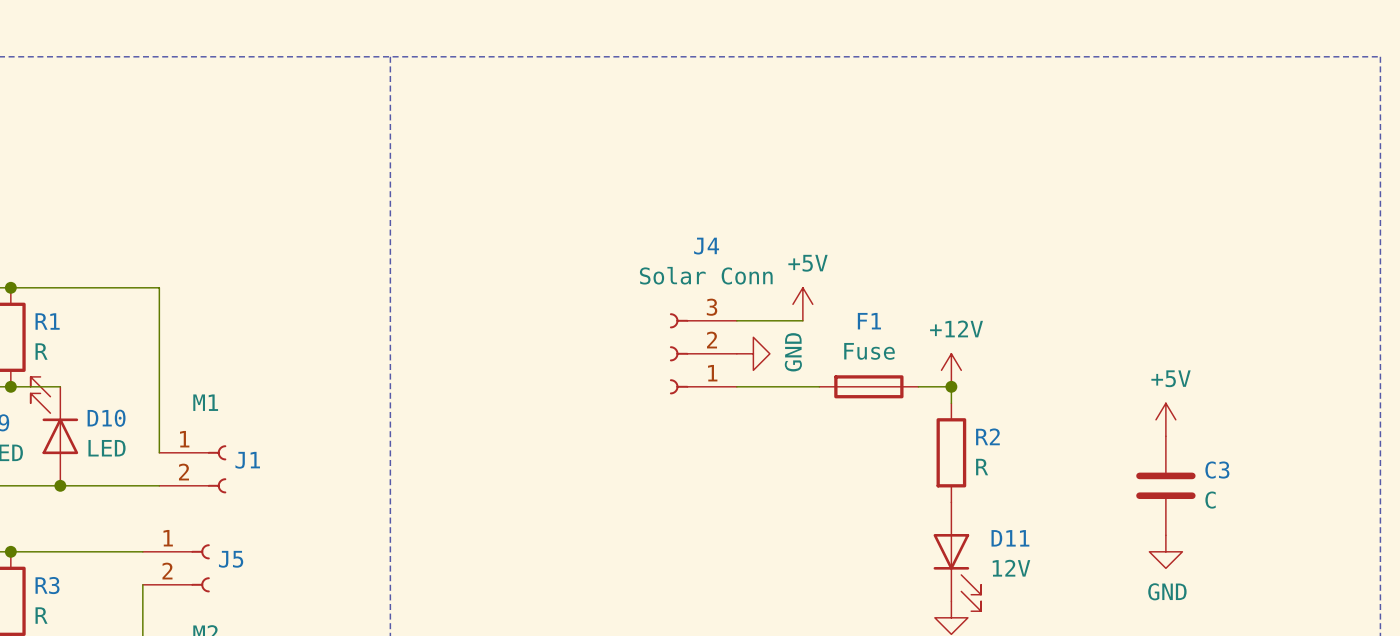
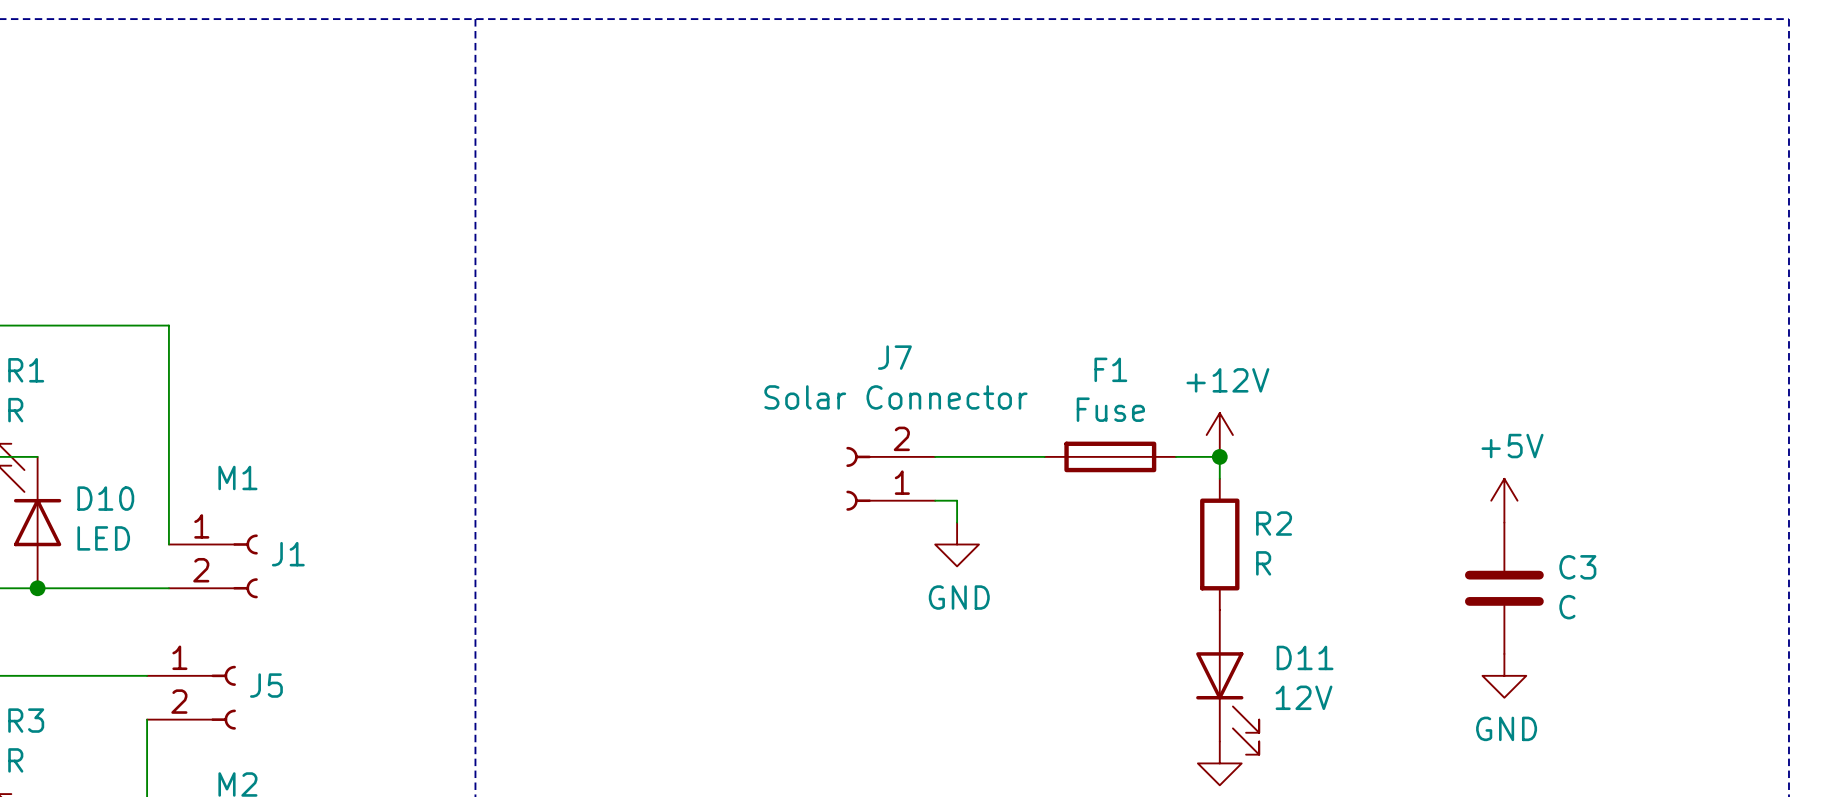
power symbol: +5V (802, 304) -> none
wire: (736, 320) (802, 320) -> none
J4: Solar Conn (703, 353) -> none
power symbol rotation: 0° (753, 353) -> 90° clockwise (957, 544)
power symbol position: GND (753, 353) -> GND (957, 544)
J7: none -> Solar Connector (890, 478)
wire: none -> (935, 500) (957, 500) (957, 522)

